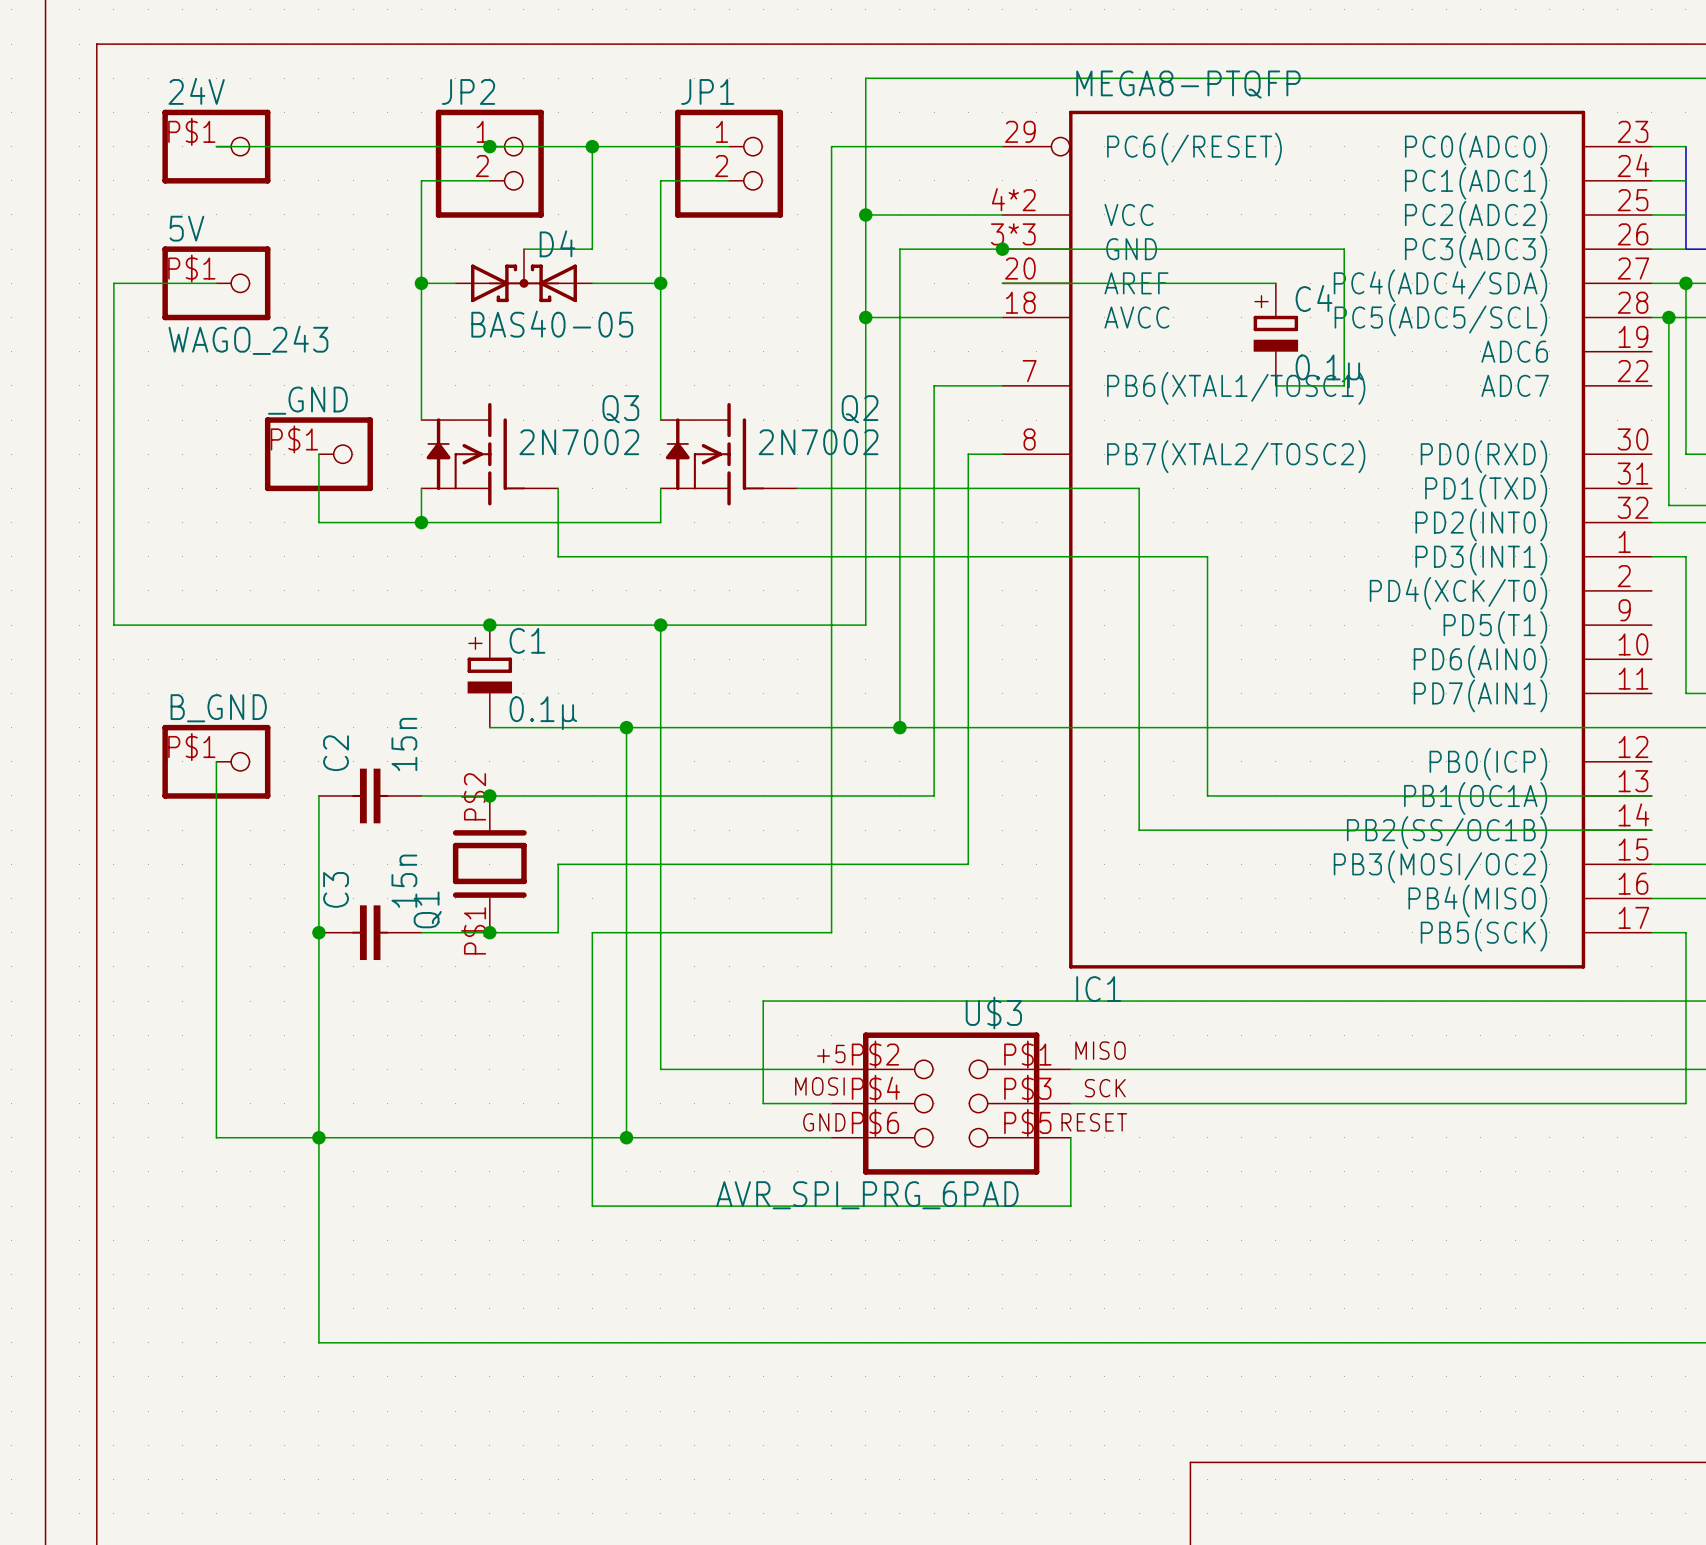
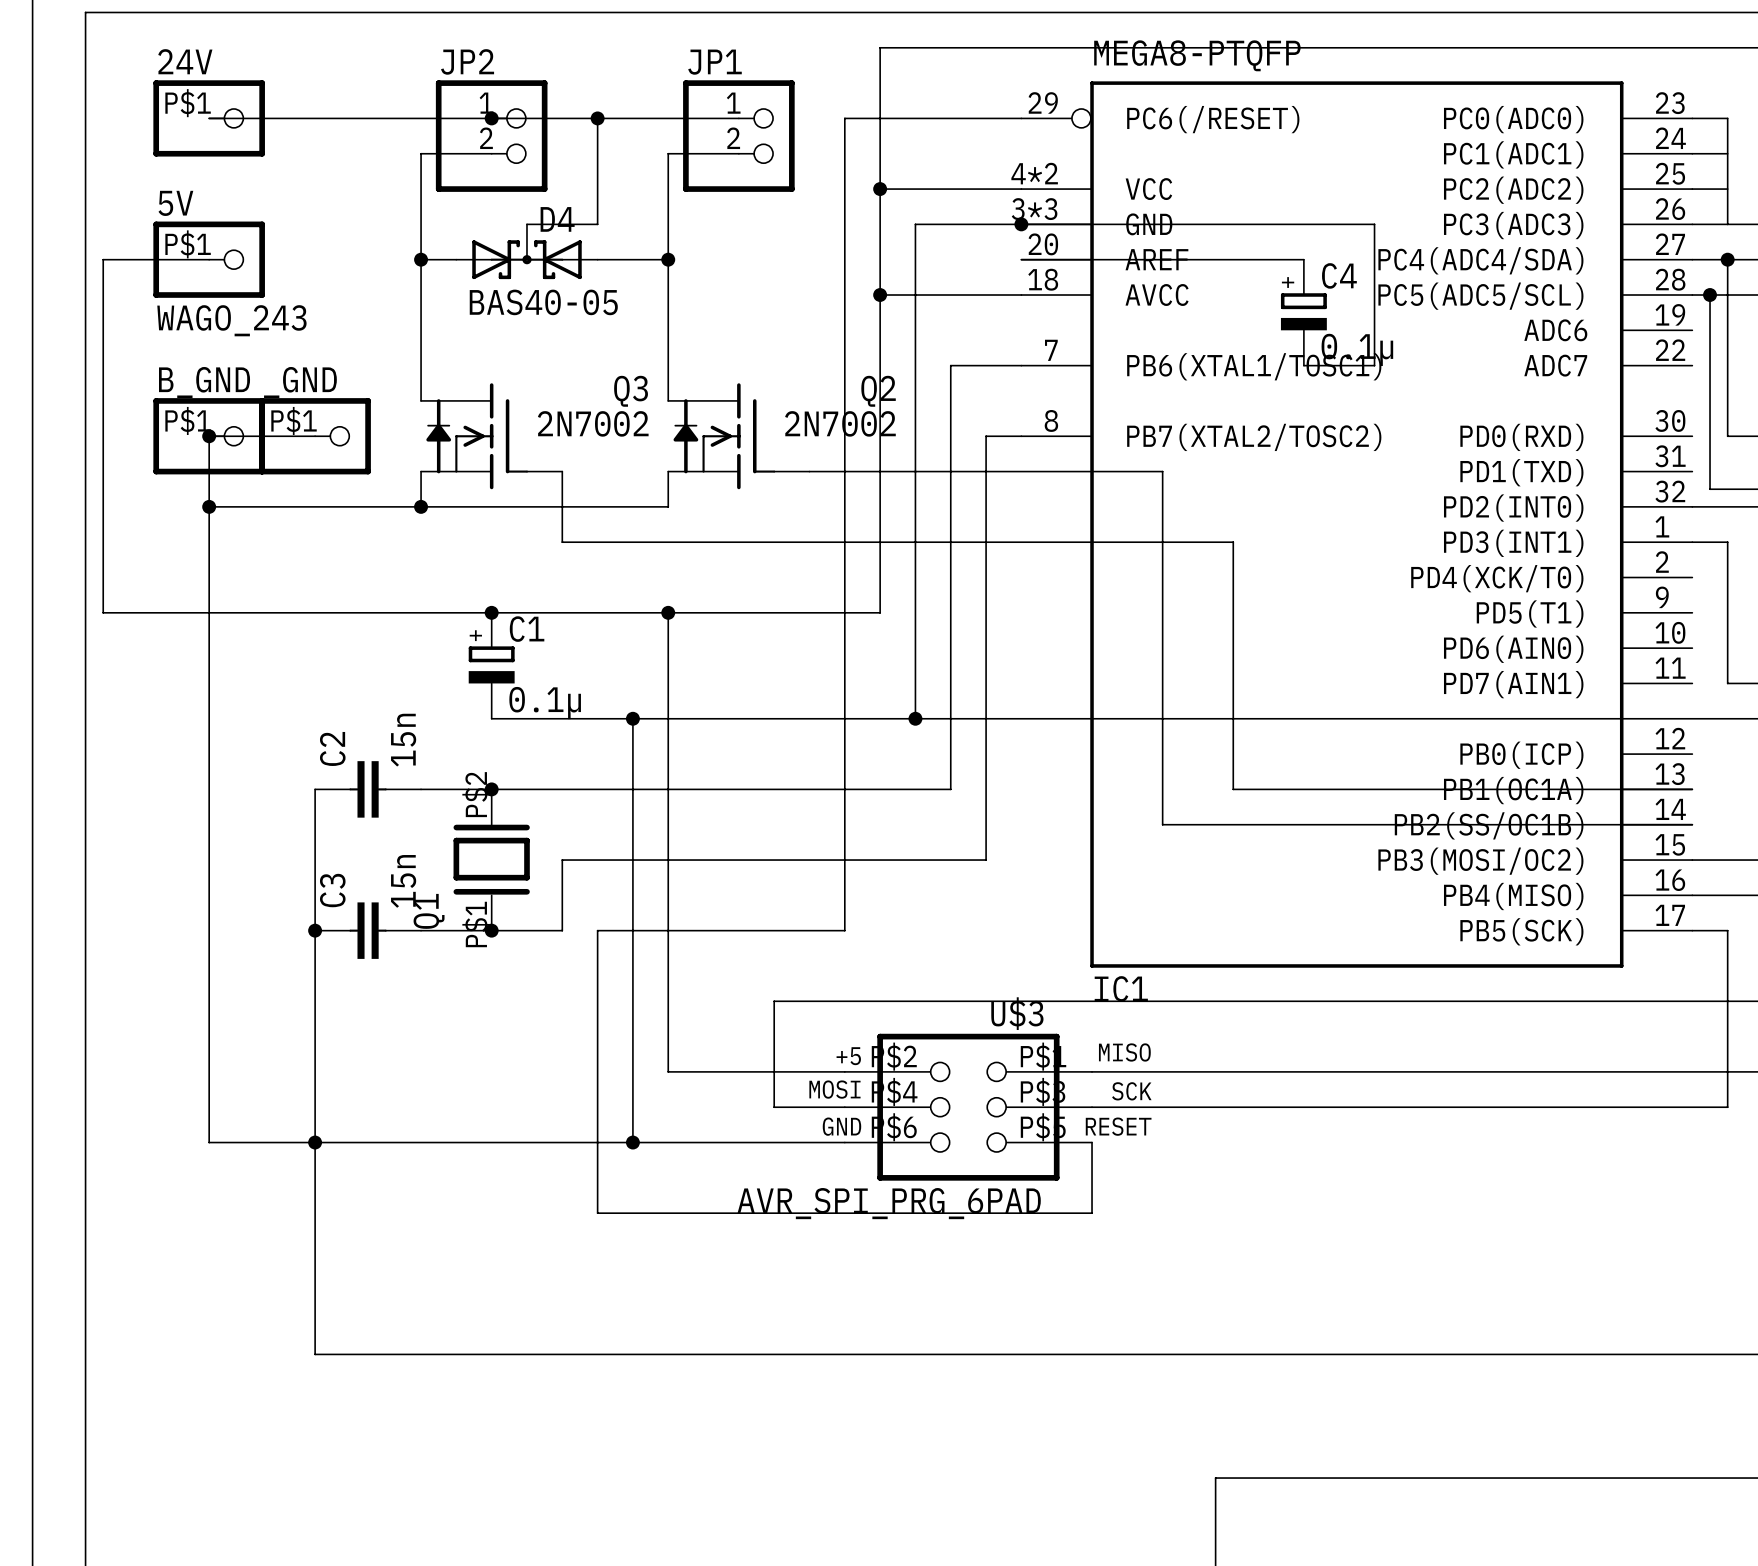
junction: none -> (209, 436)
wire: (318, 454) (318, 522) -> (209, 506) (315, 506)
wire: none -> (315, 436) (209, 436) (209, 754)
junction: none -> (209, 506)
B_GND position: (216, 761) -> (209, 436)

